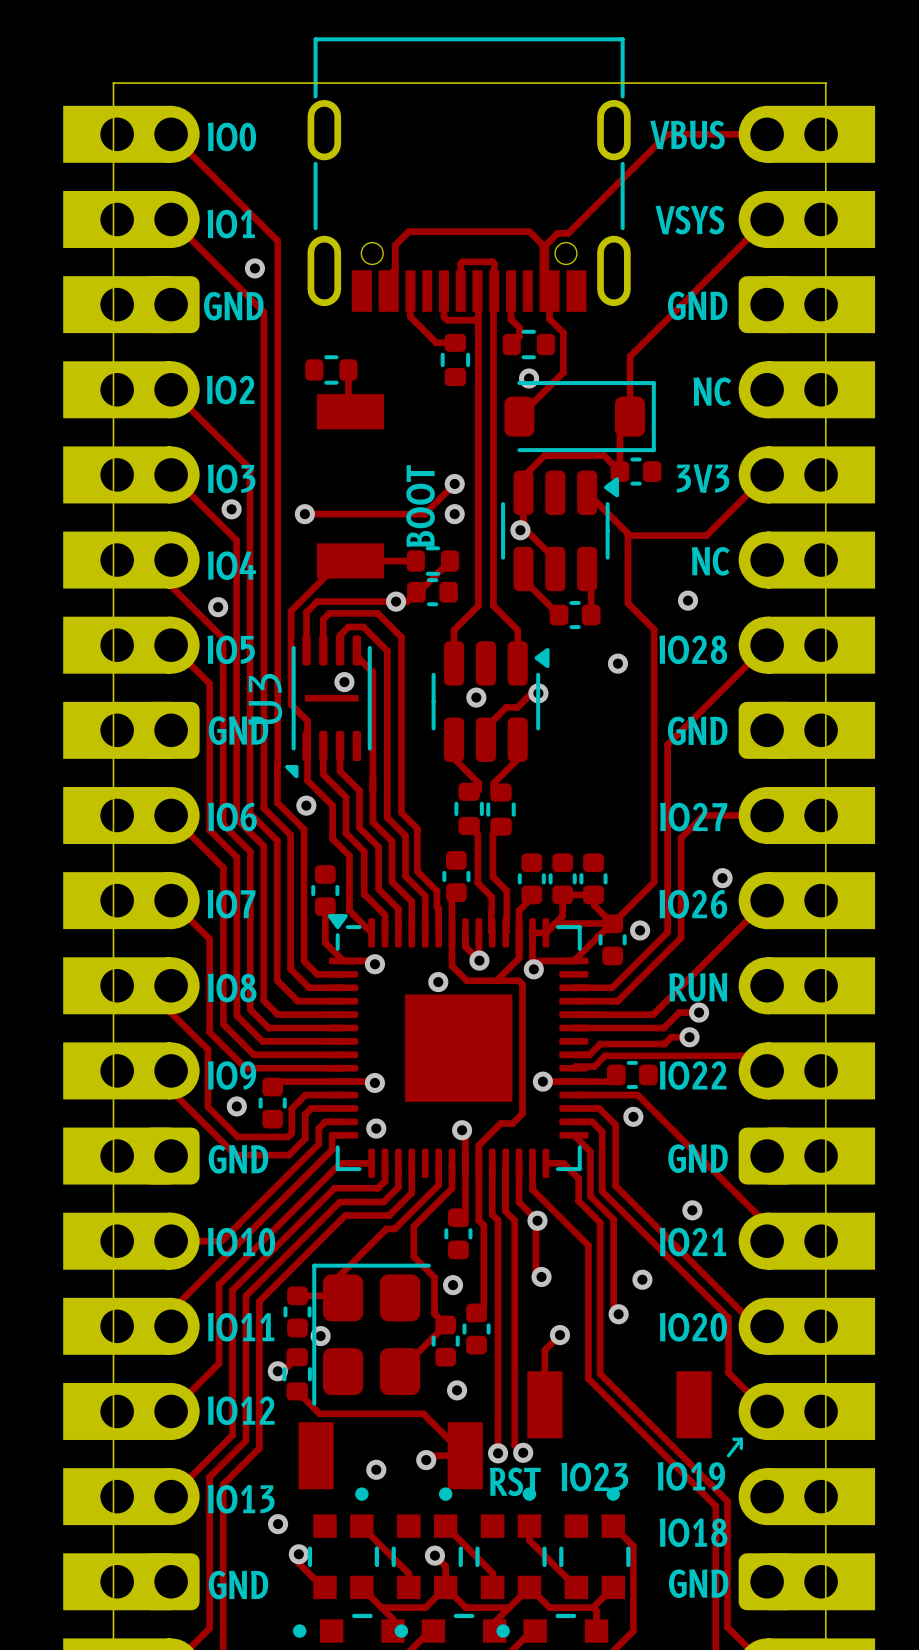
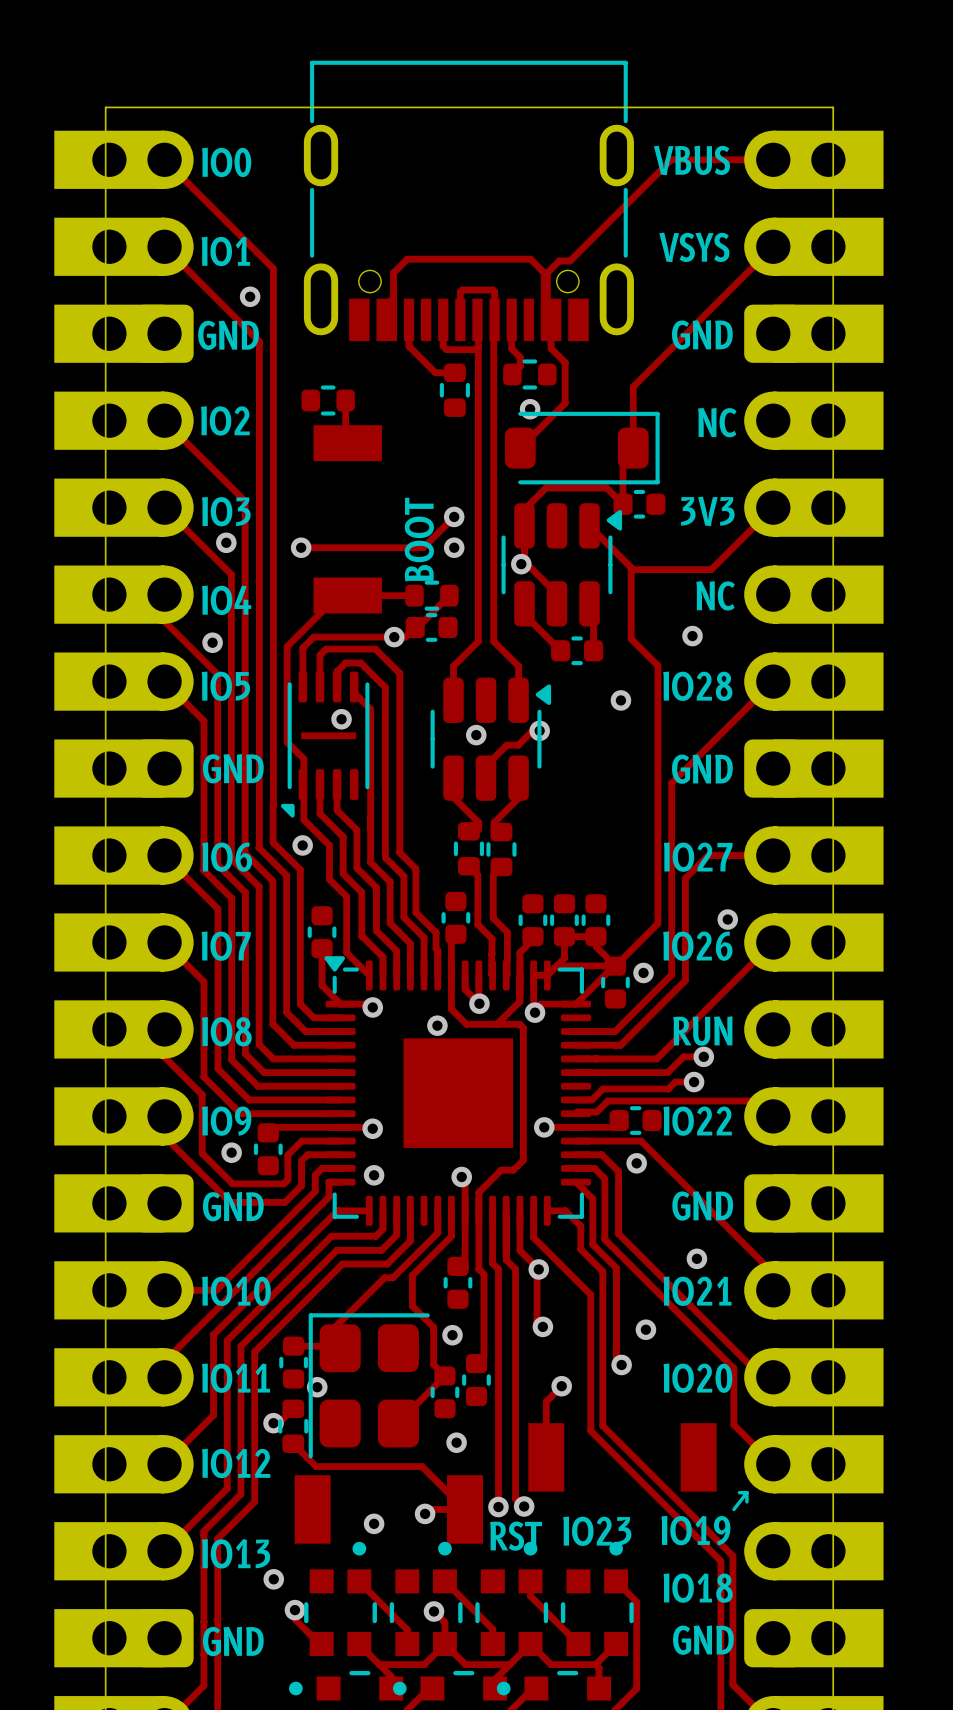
U3 name: U3 (265, 699) -> none

